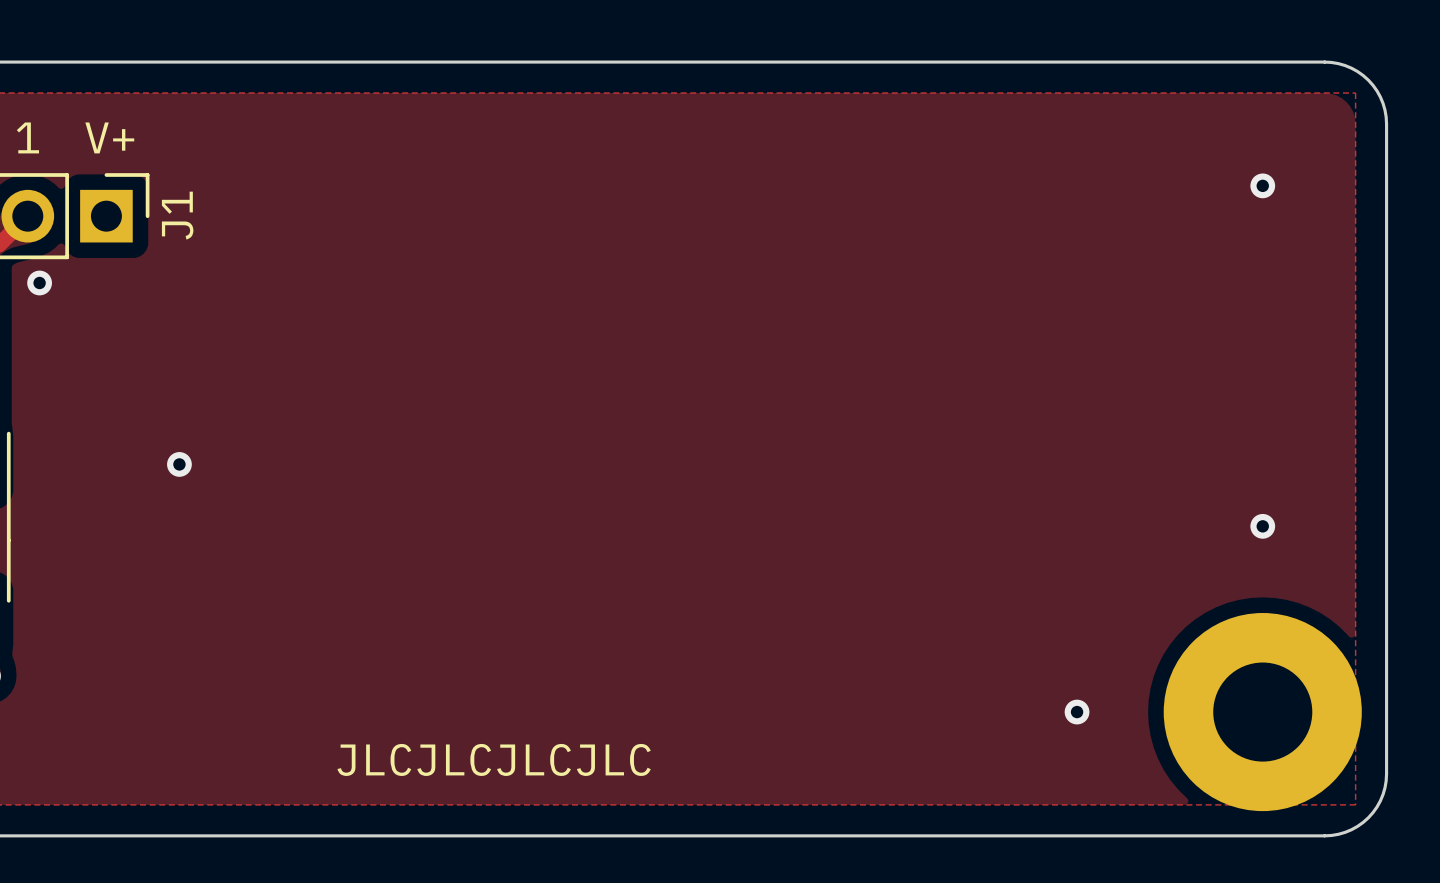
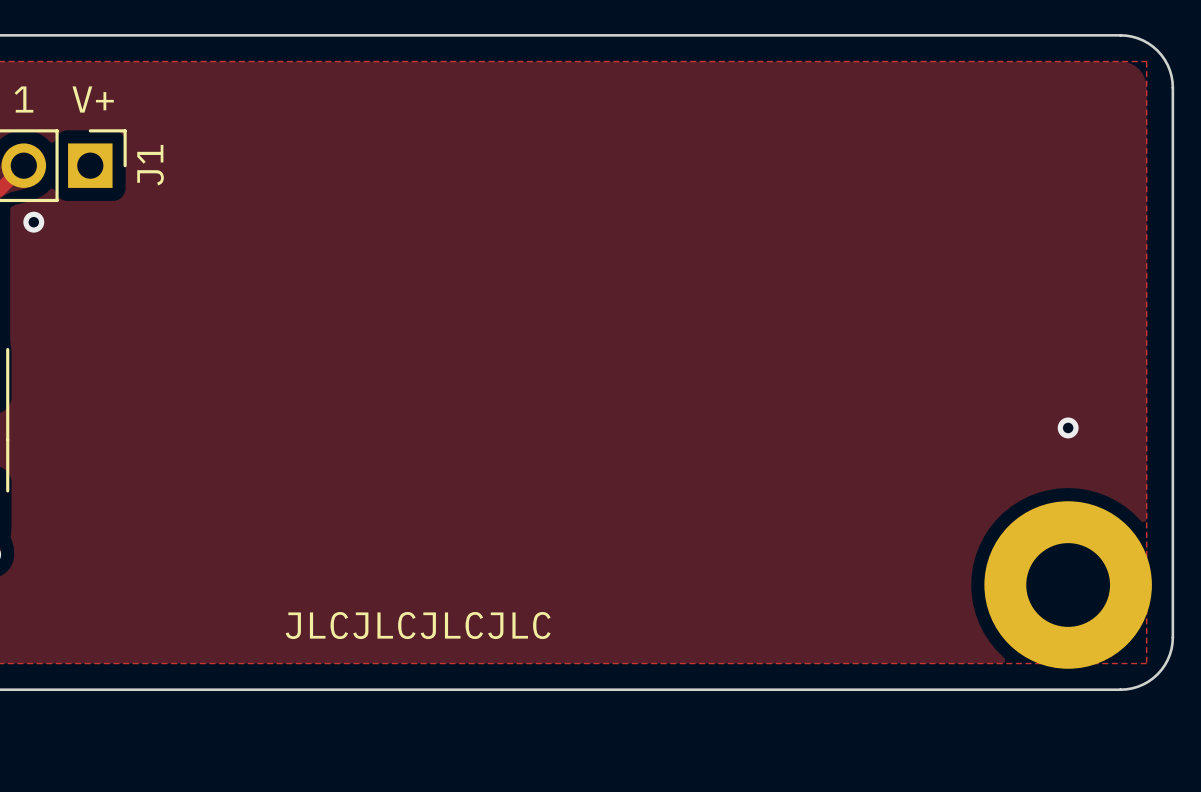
via: (1262, 185) -> none
via: (179, 464) -> none
via: (1077, 712) -> none

